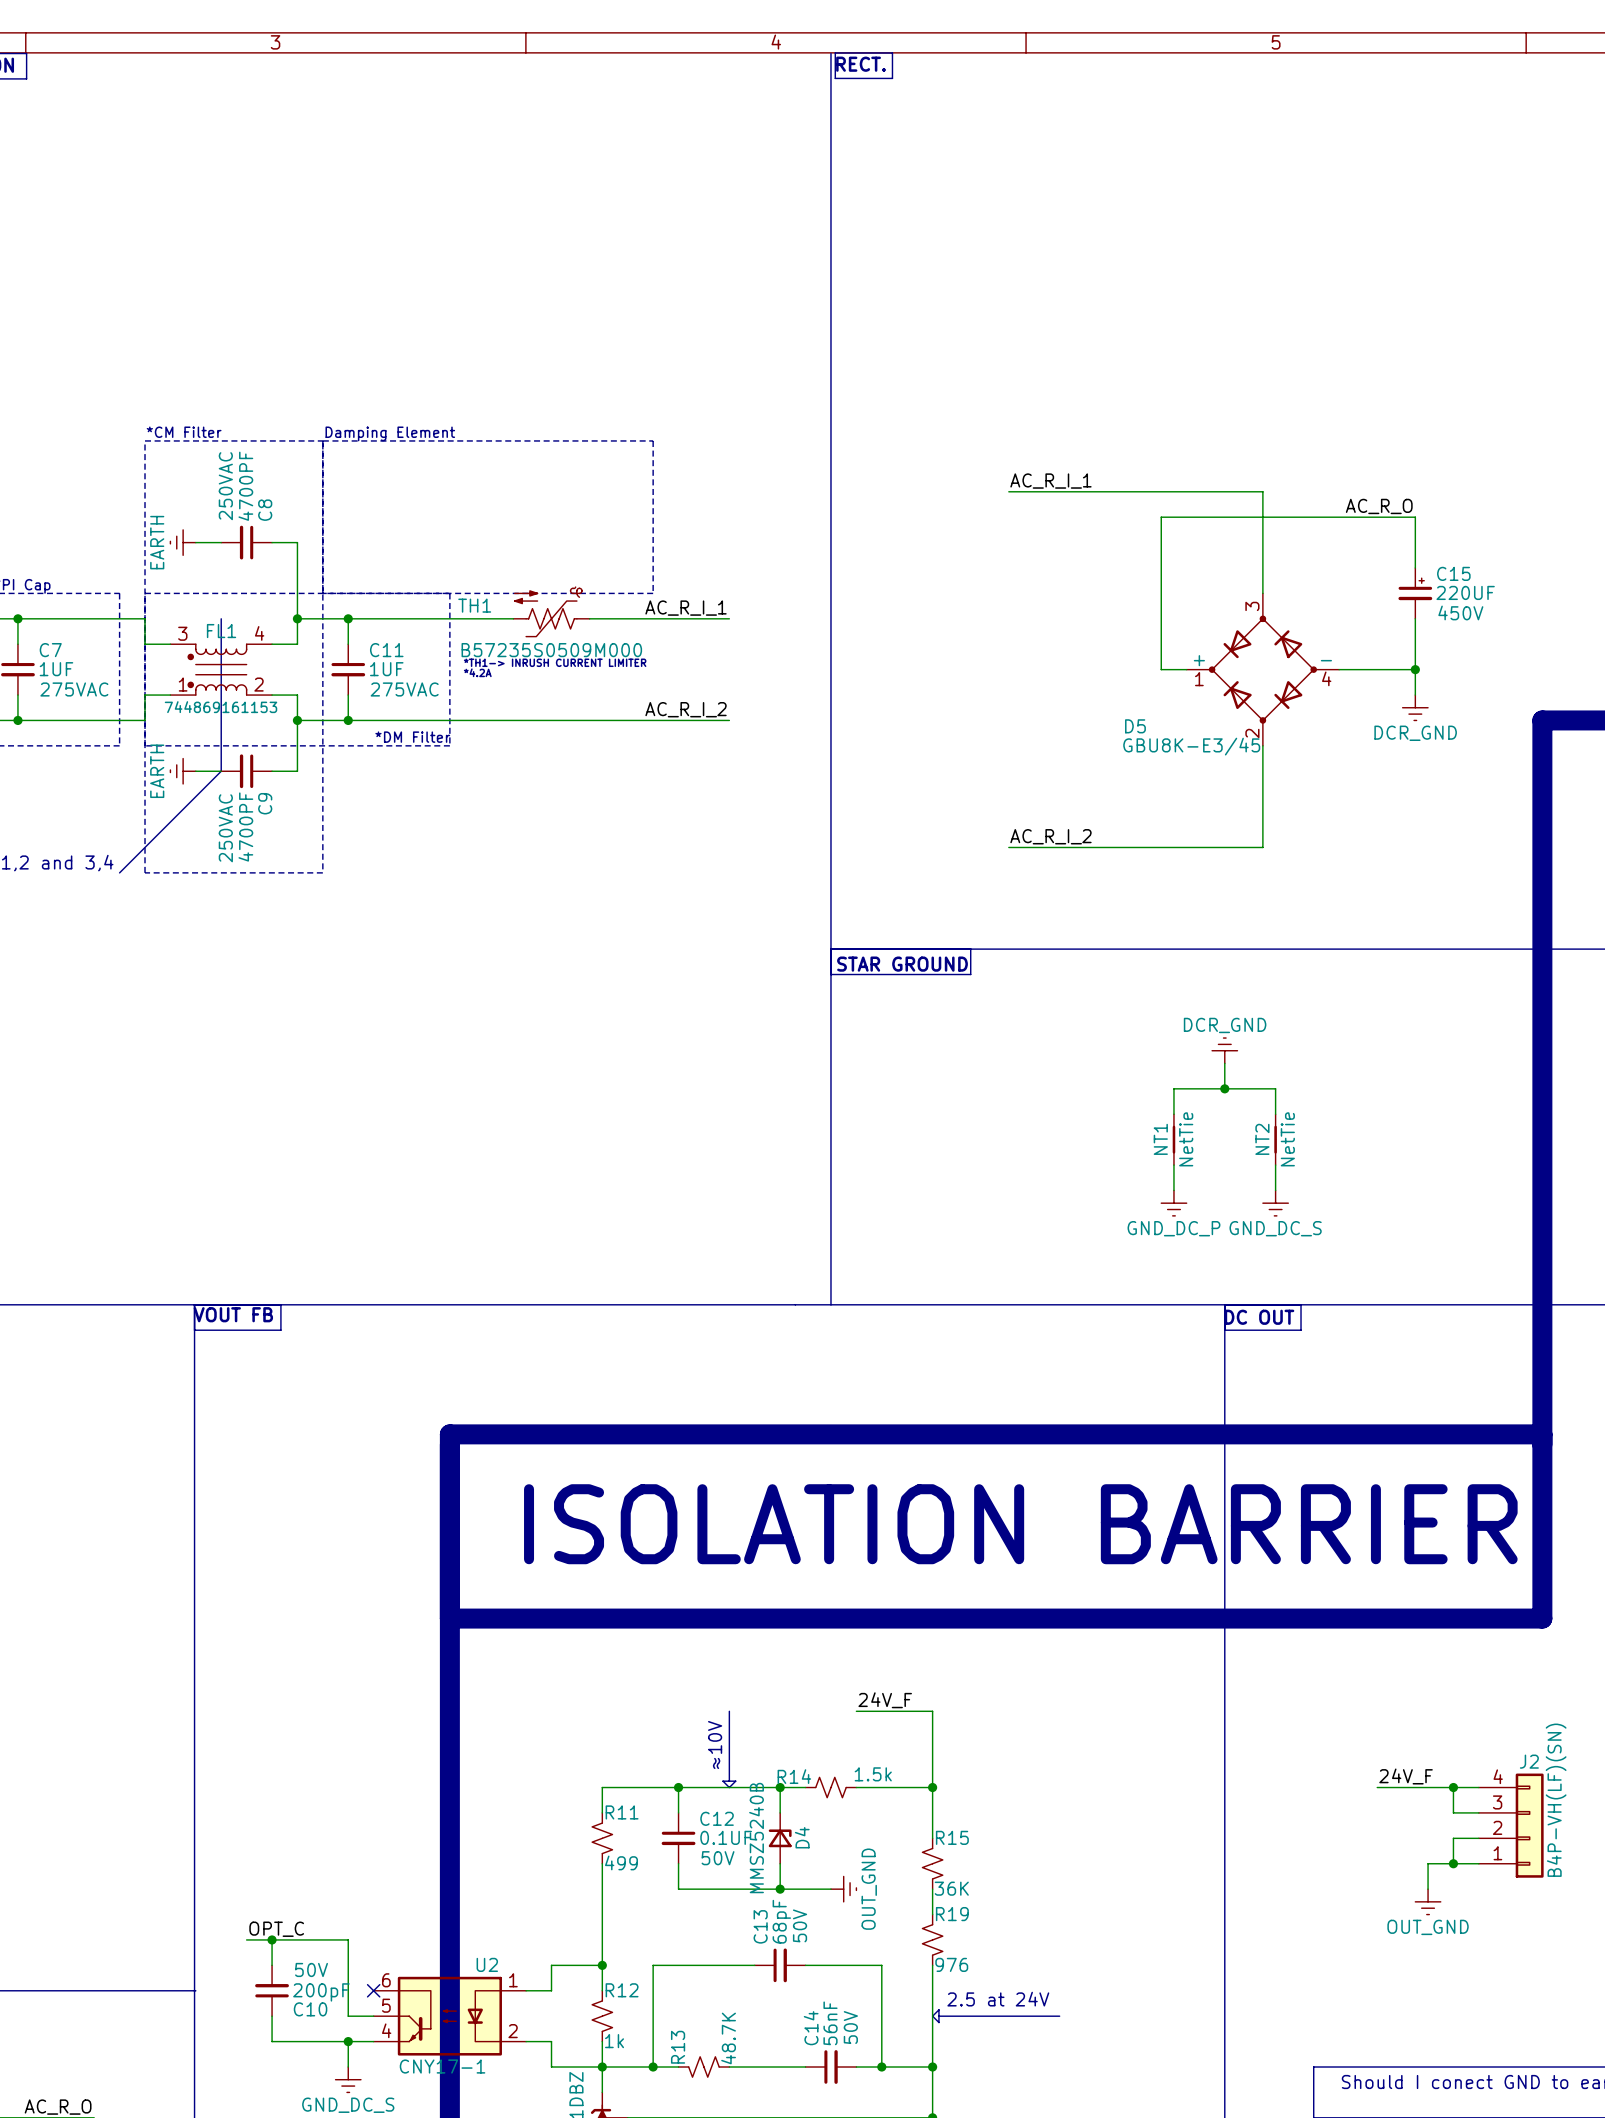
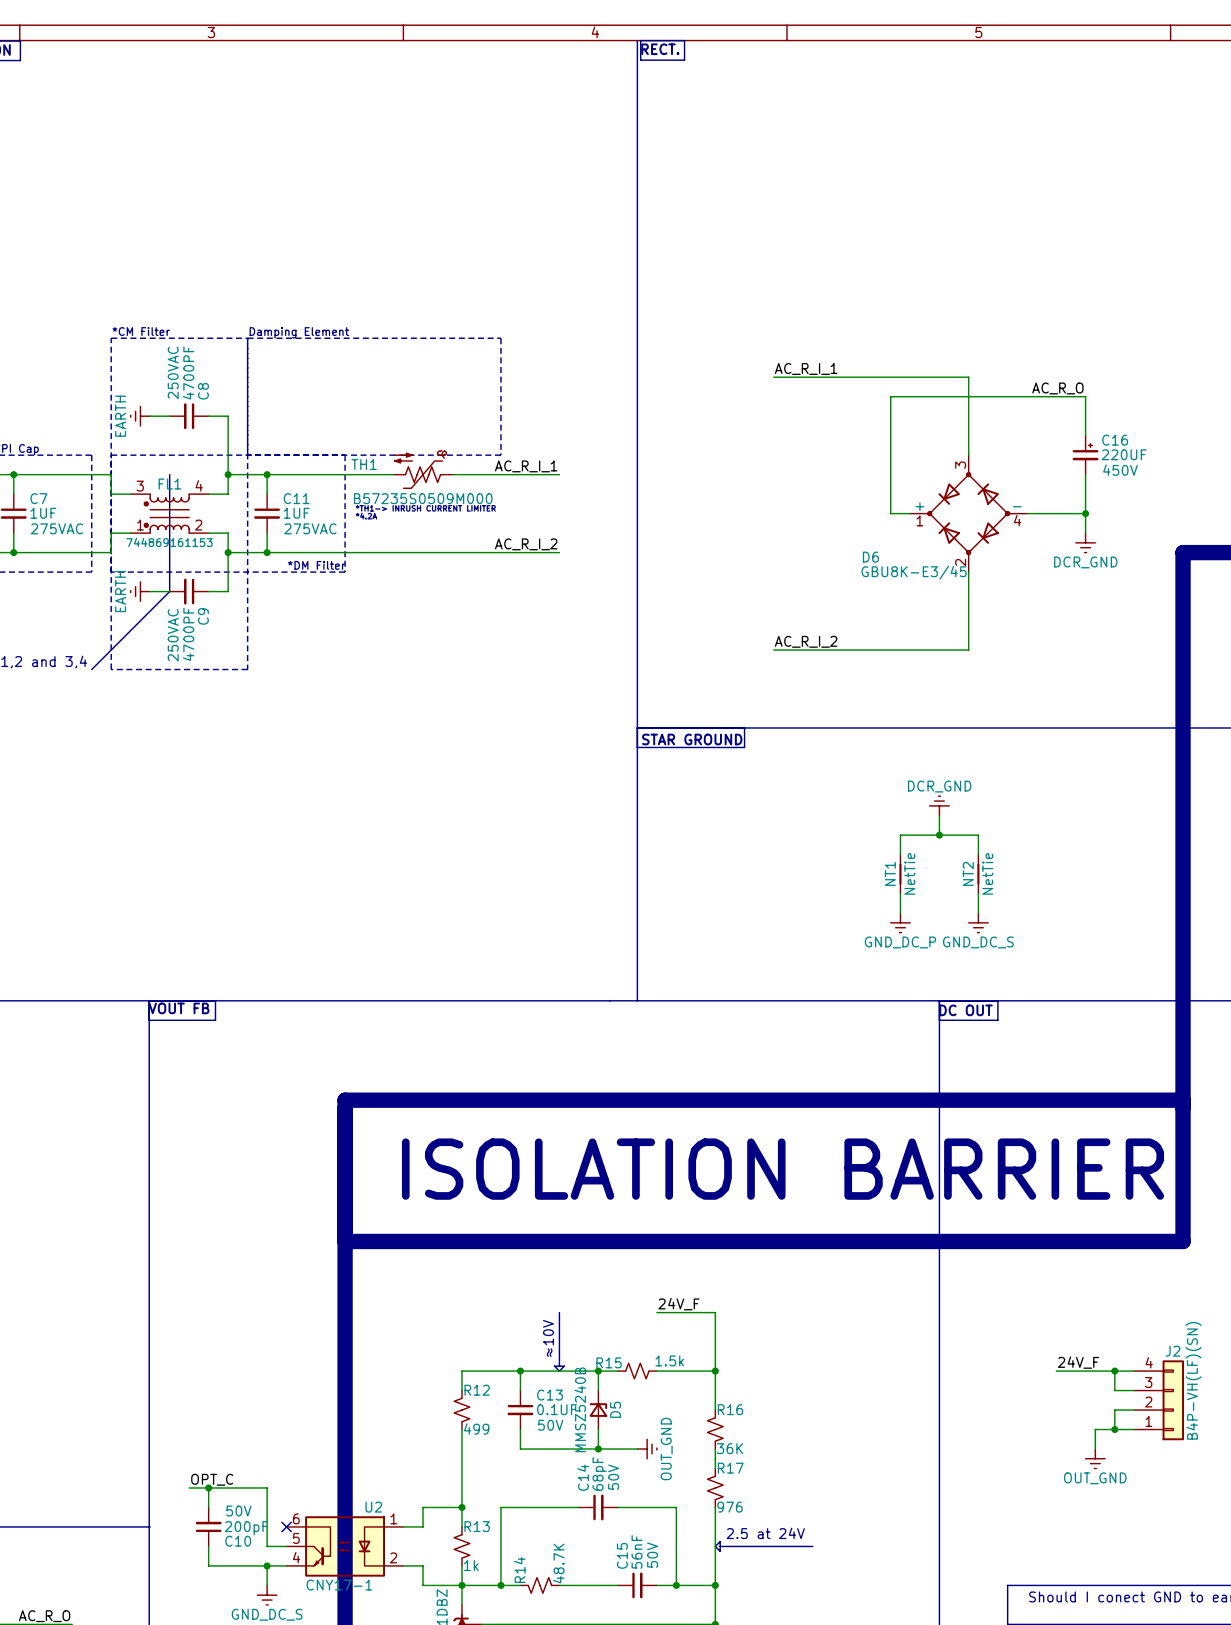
C15 name: C15 (1453, 573) -> C16 (1115, 440)
D5 name: D5 (1135, 726) -> D6 (870, 557)
R14 name: R14 (794, 1776) -> R15 (609, 1362)
R11 name: R11 (622, 1812) -> R12 (477, 1390)
C12 name: C12 (717, 1818) -> C13 (549, 1395)
D4 name: D4 (802, 1837) -> D5 (615, 1409)
R15 name: R15 (952, 1837) -> R16 (730, 1409)
R19 name: R19 (952, 1914) -> R17 (730, 1468)
C13 name: C13 (760, 1926) -> C14 (583, 1477)
R12 name: R12 (622, 1990) -> R13 (477, 1526)
C14 name: C14 (811, 2028) -> C15 (622, 1555)
R13 name: R13 (678, 2047) -> R14 (519, 1570)

